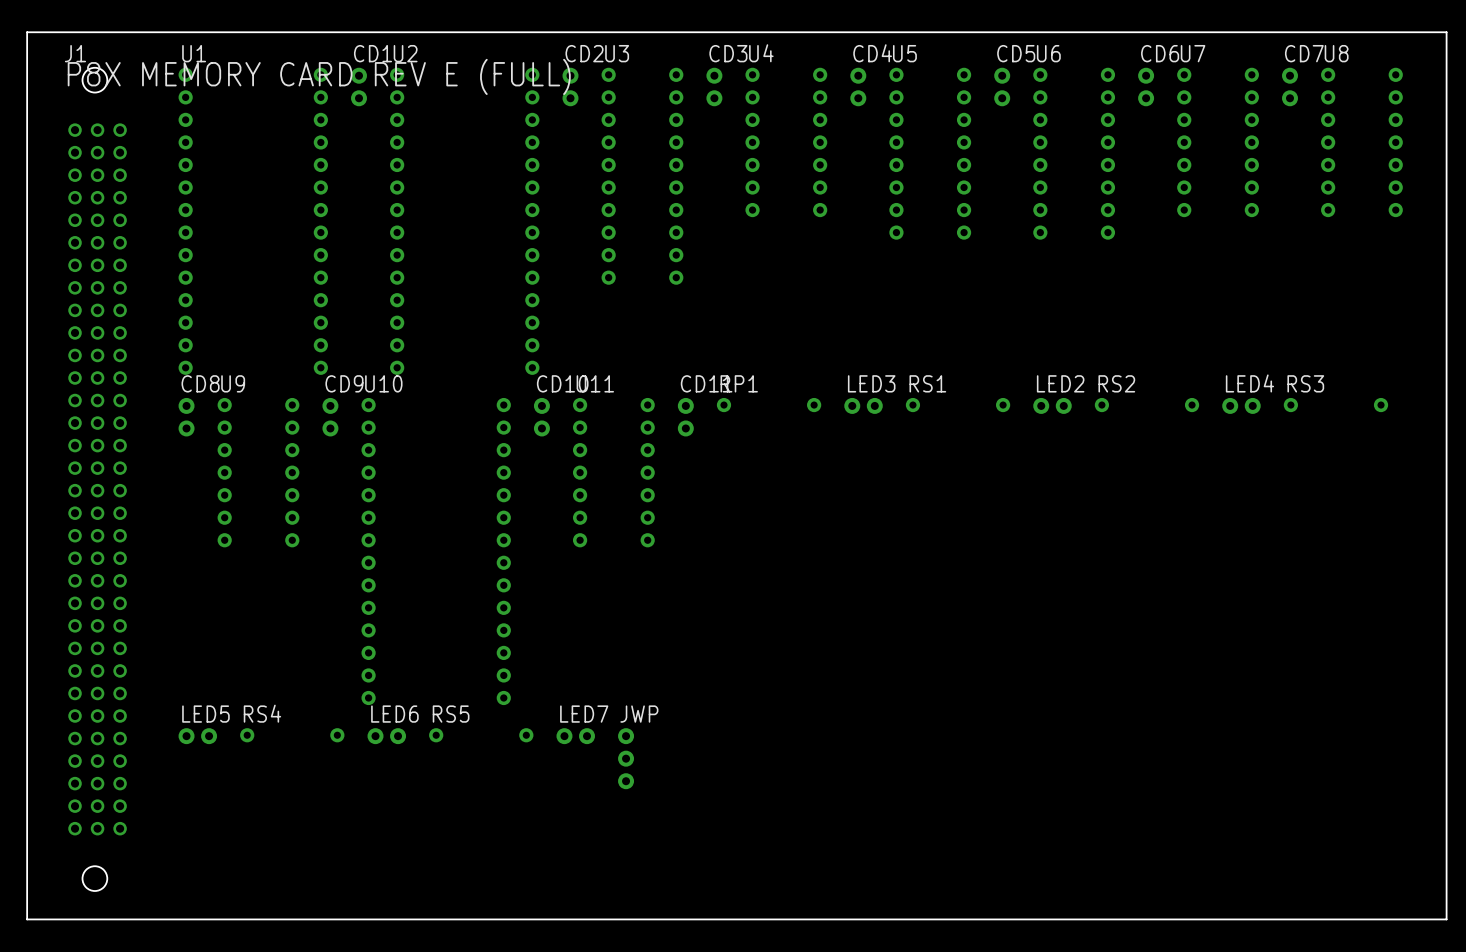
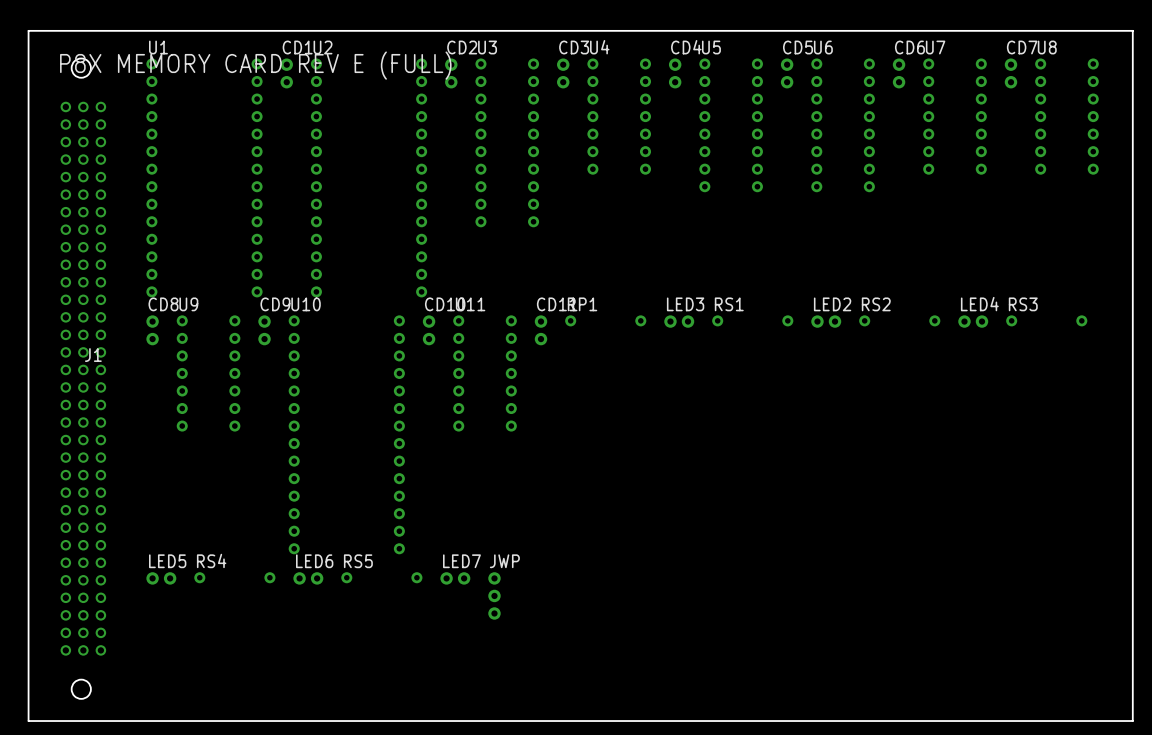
J1 name position: J1 (75, 53) -> J1 (93, 355)

